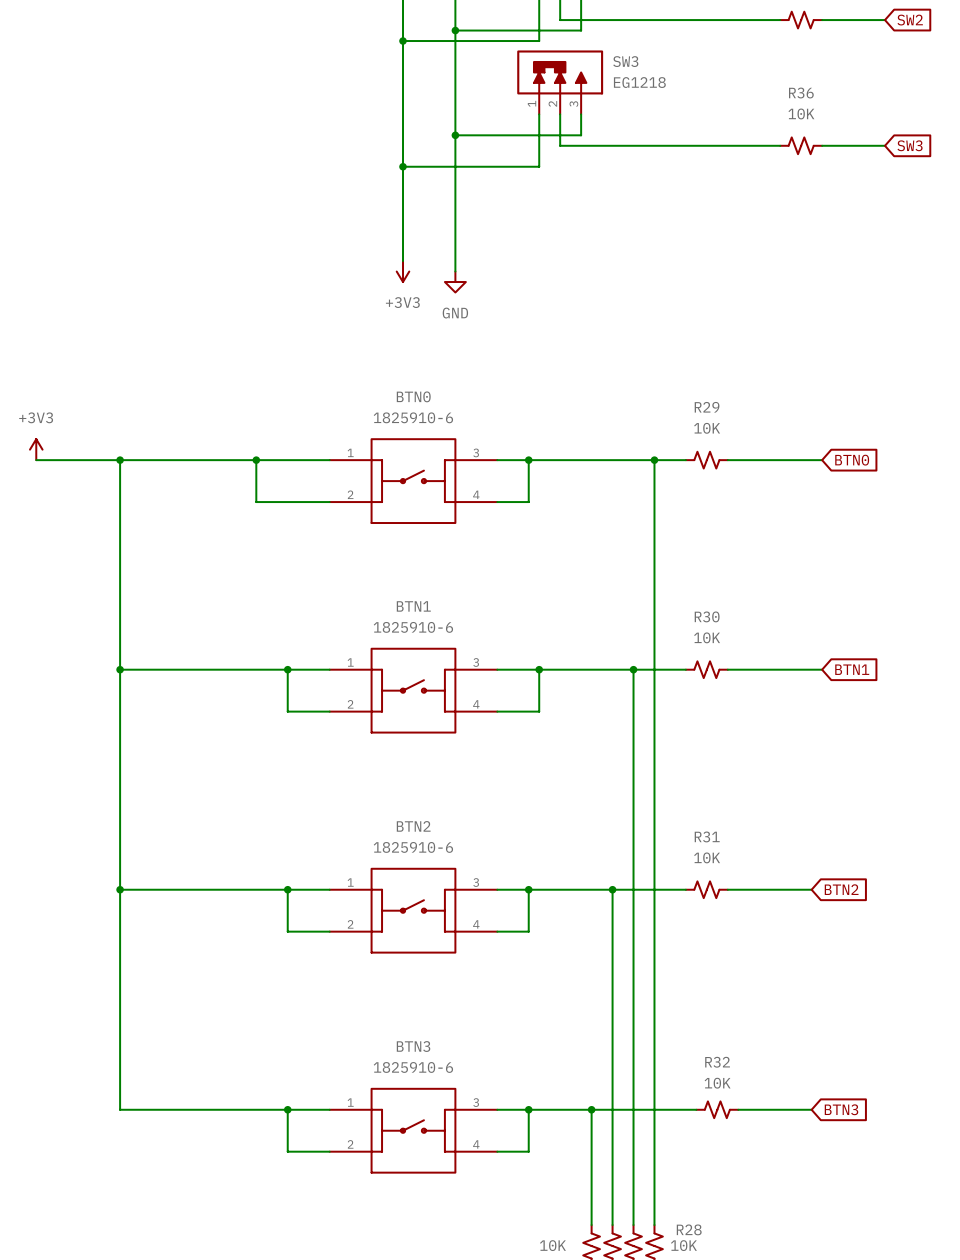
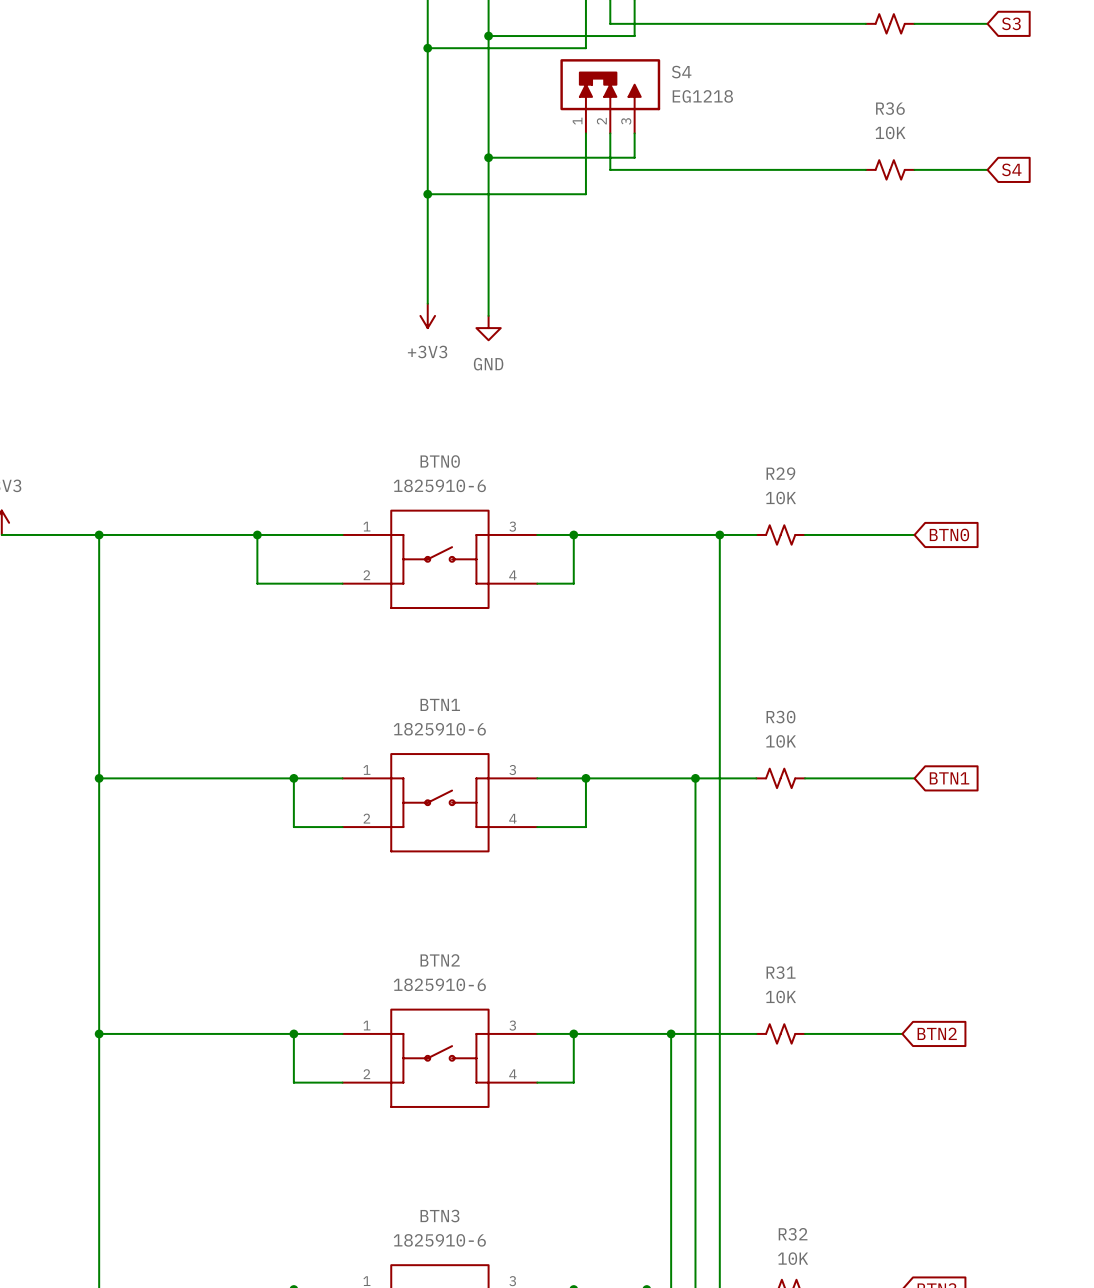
global label: SW2 (910, 20) -> S3 (1011, 23)
SW3 name: SW3 (625, 61) -> S4 (681, 72)
global label: SW3 (910, 145) -> S4 (1011, 169)

